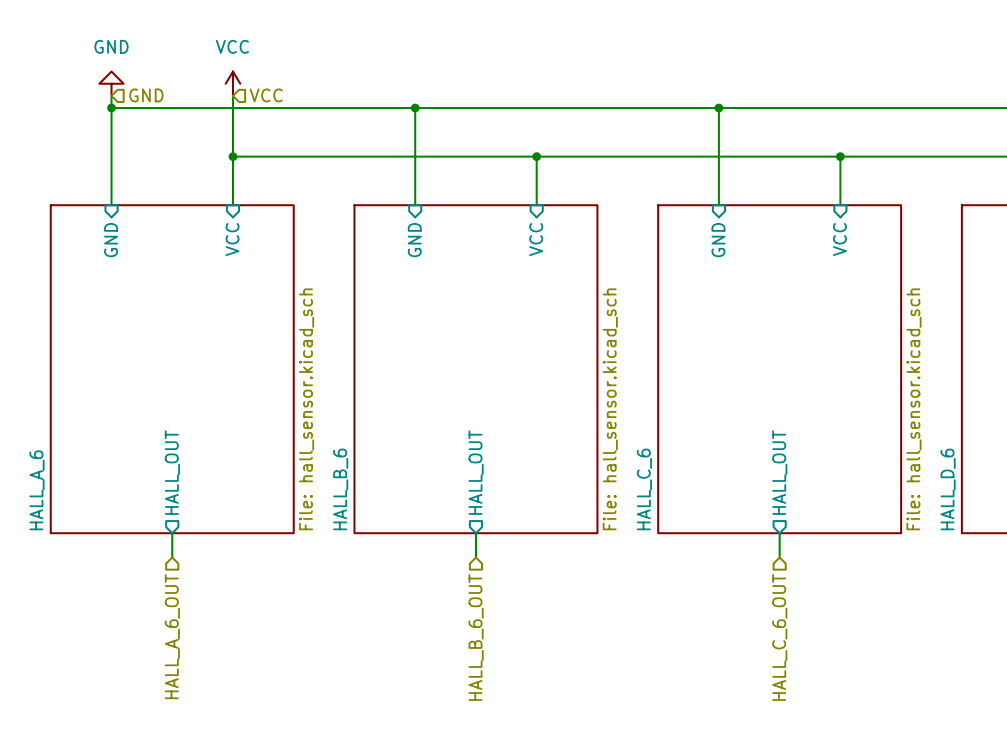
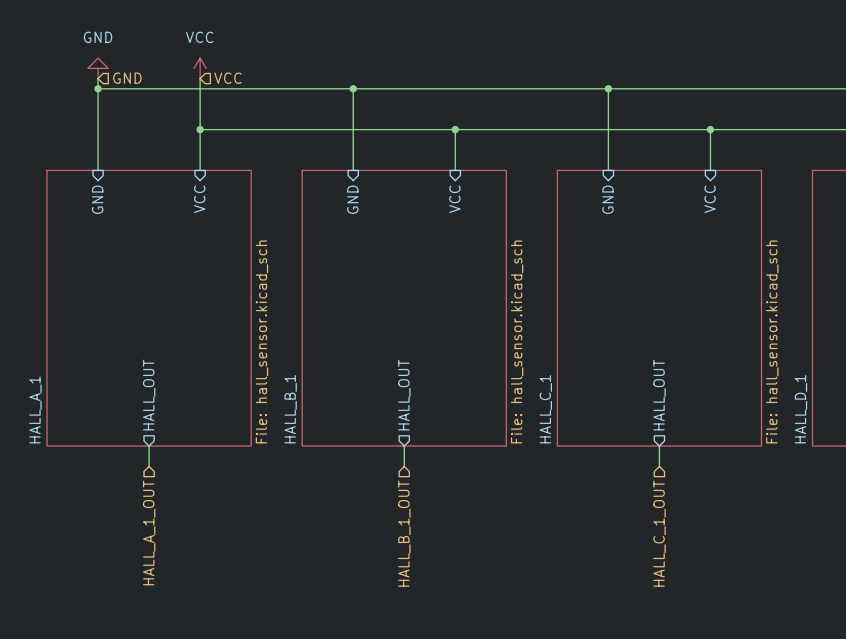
sheet HALL_B_6 name: HALL_B_6 (340, 489) -> HALL_B_1 (290, 409)
sheet HALL_C_6 name: HALL_C_6 (644, 489) -> HALL_C_1 (545, 409)
sheet HALL_D_6 name: HALL_D_6 (948, 489) -> HALL_D_1 (800, 409)
sheet HALL_A_6 name: HALL_A_6 (36, 490) -> HALL_A_1 (35, 409)
hierarchical label: HALL_A_6_OUT (172, 636) -> HALL_A_1_OUT (149, 532)
hierarchical label: HALL_B_6_OUT (476, 637) -> HALL_B_1_OUT (404, 533)
hierarchical label: HALL_C_6_OUT (779, 637) -> HALL_C_1_OUT (659, 533)

